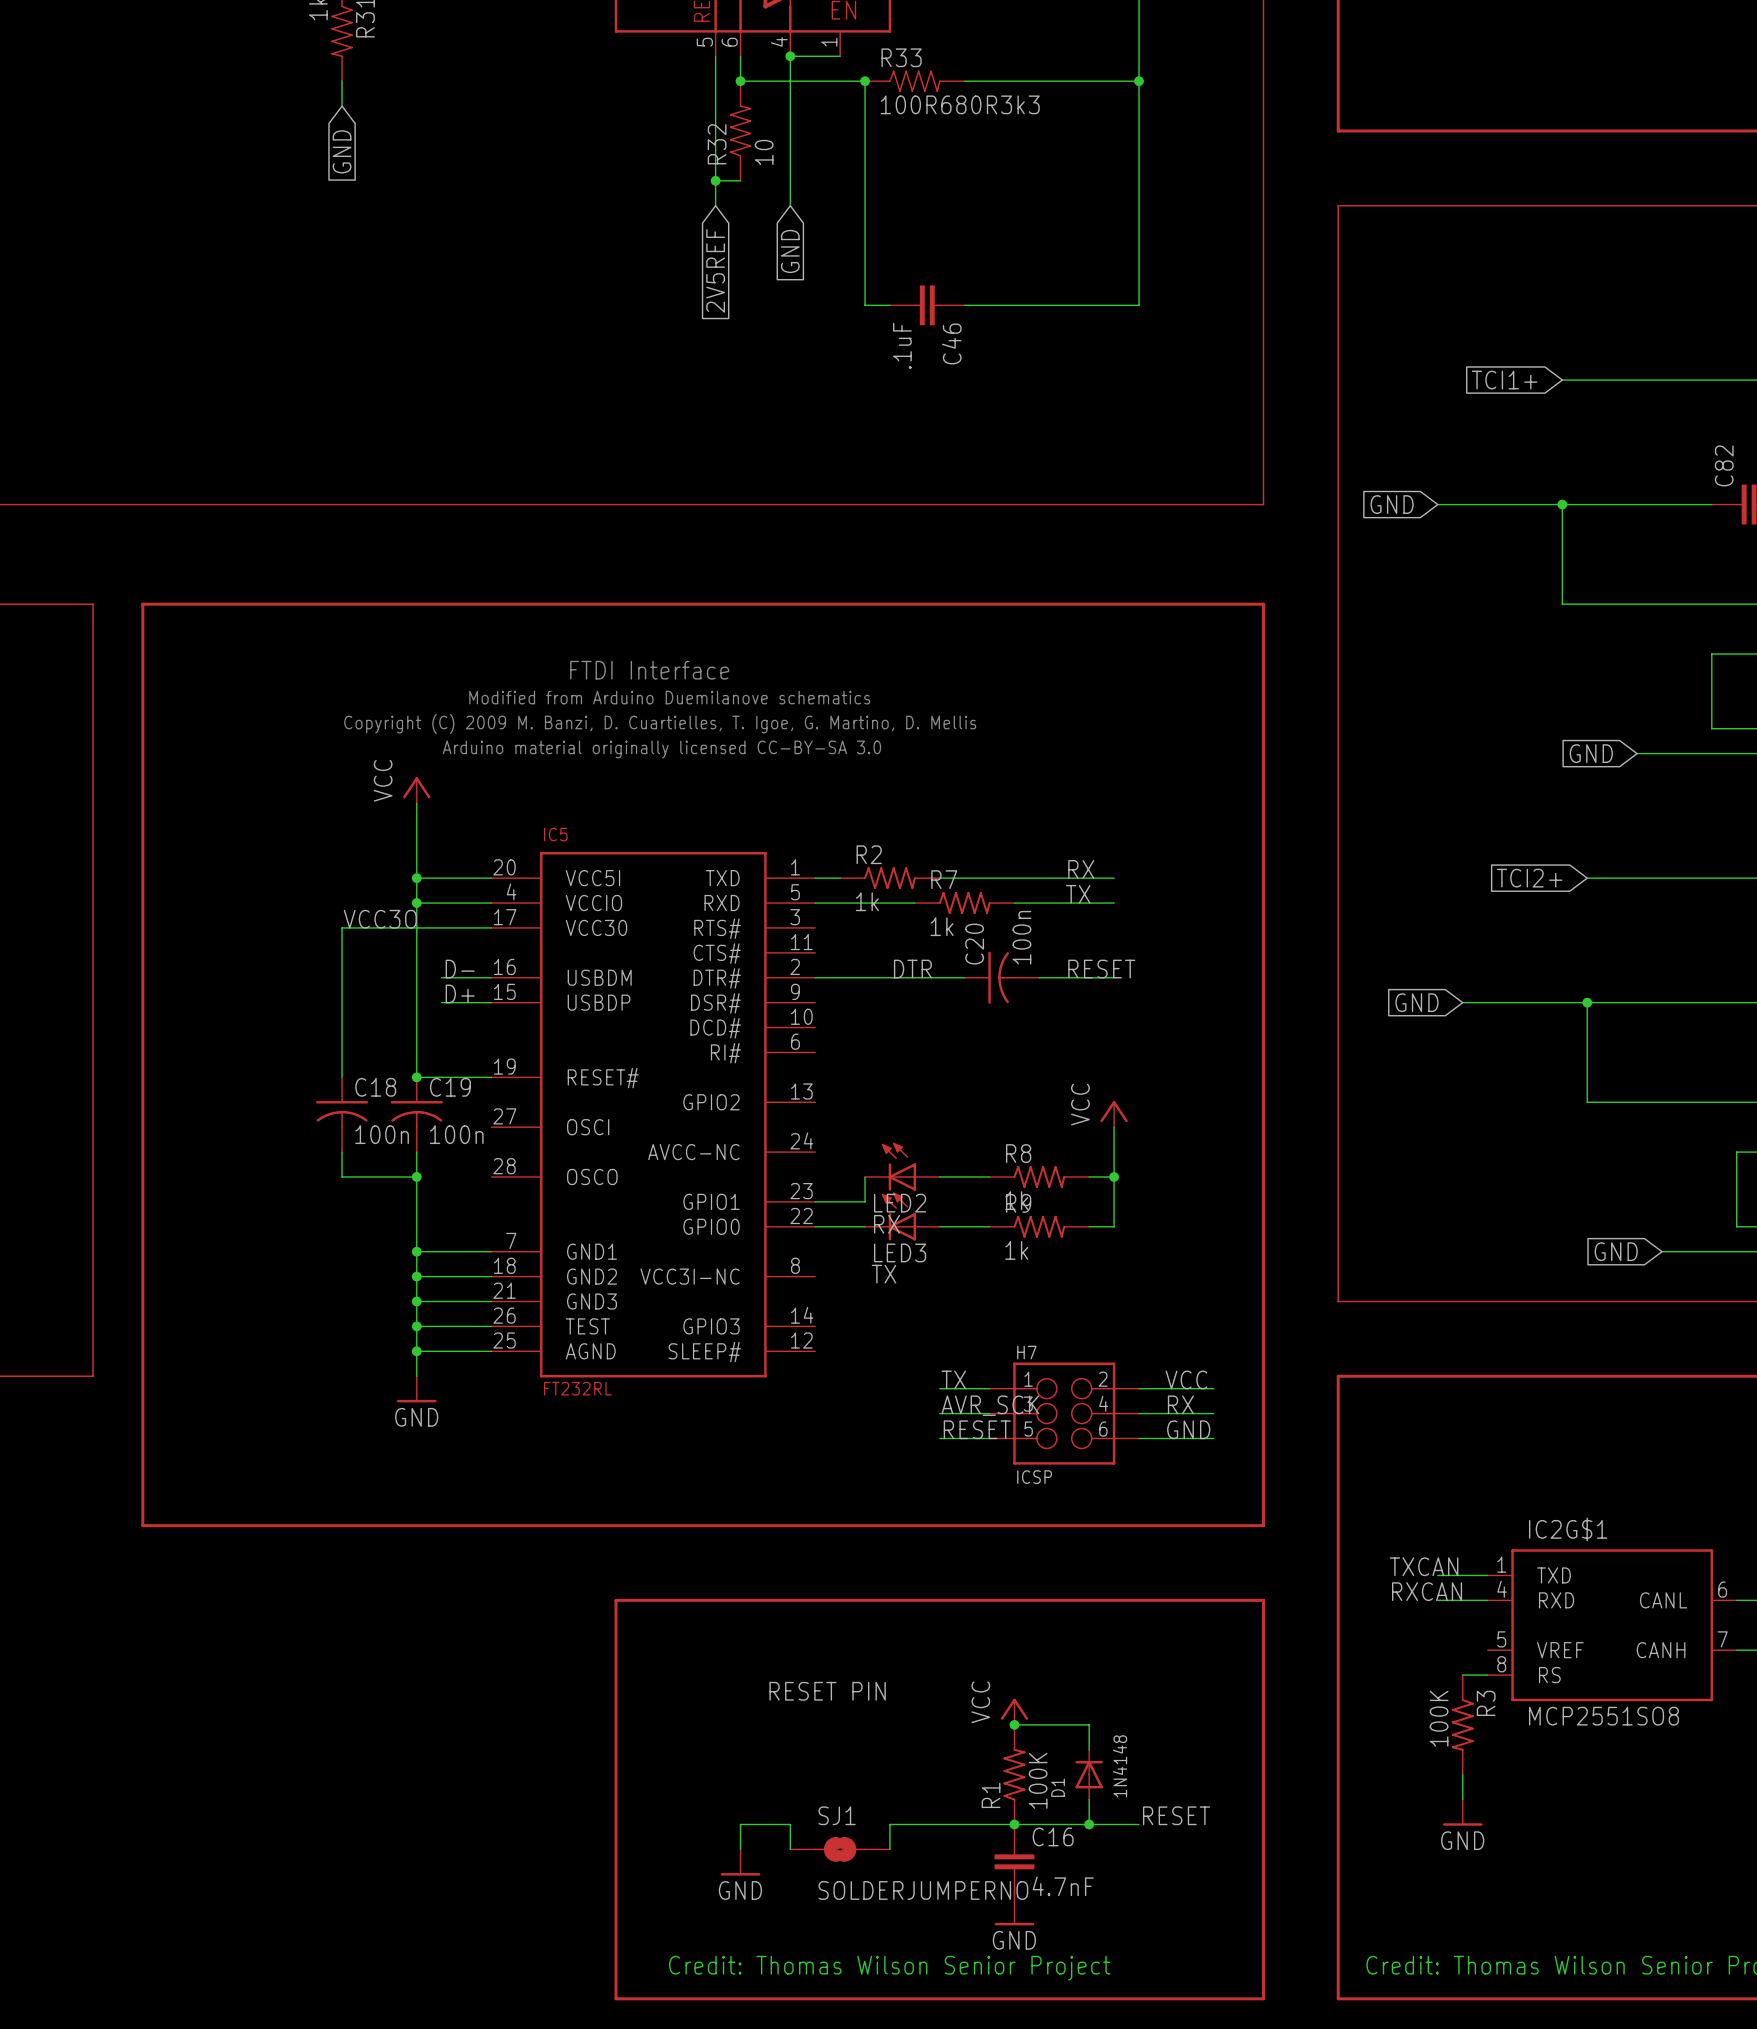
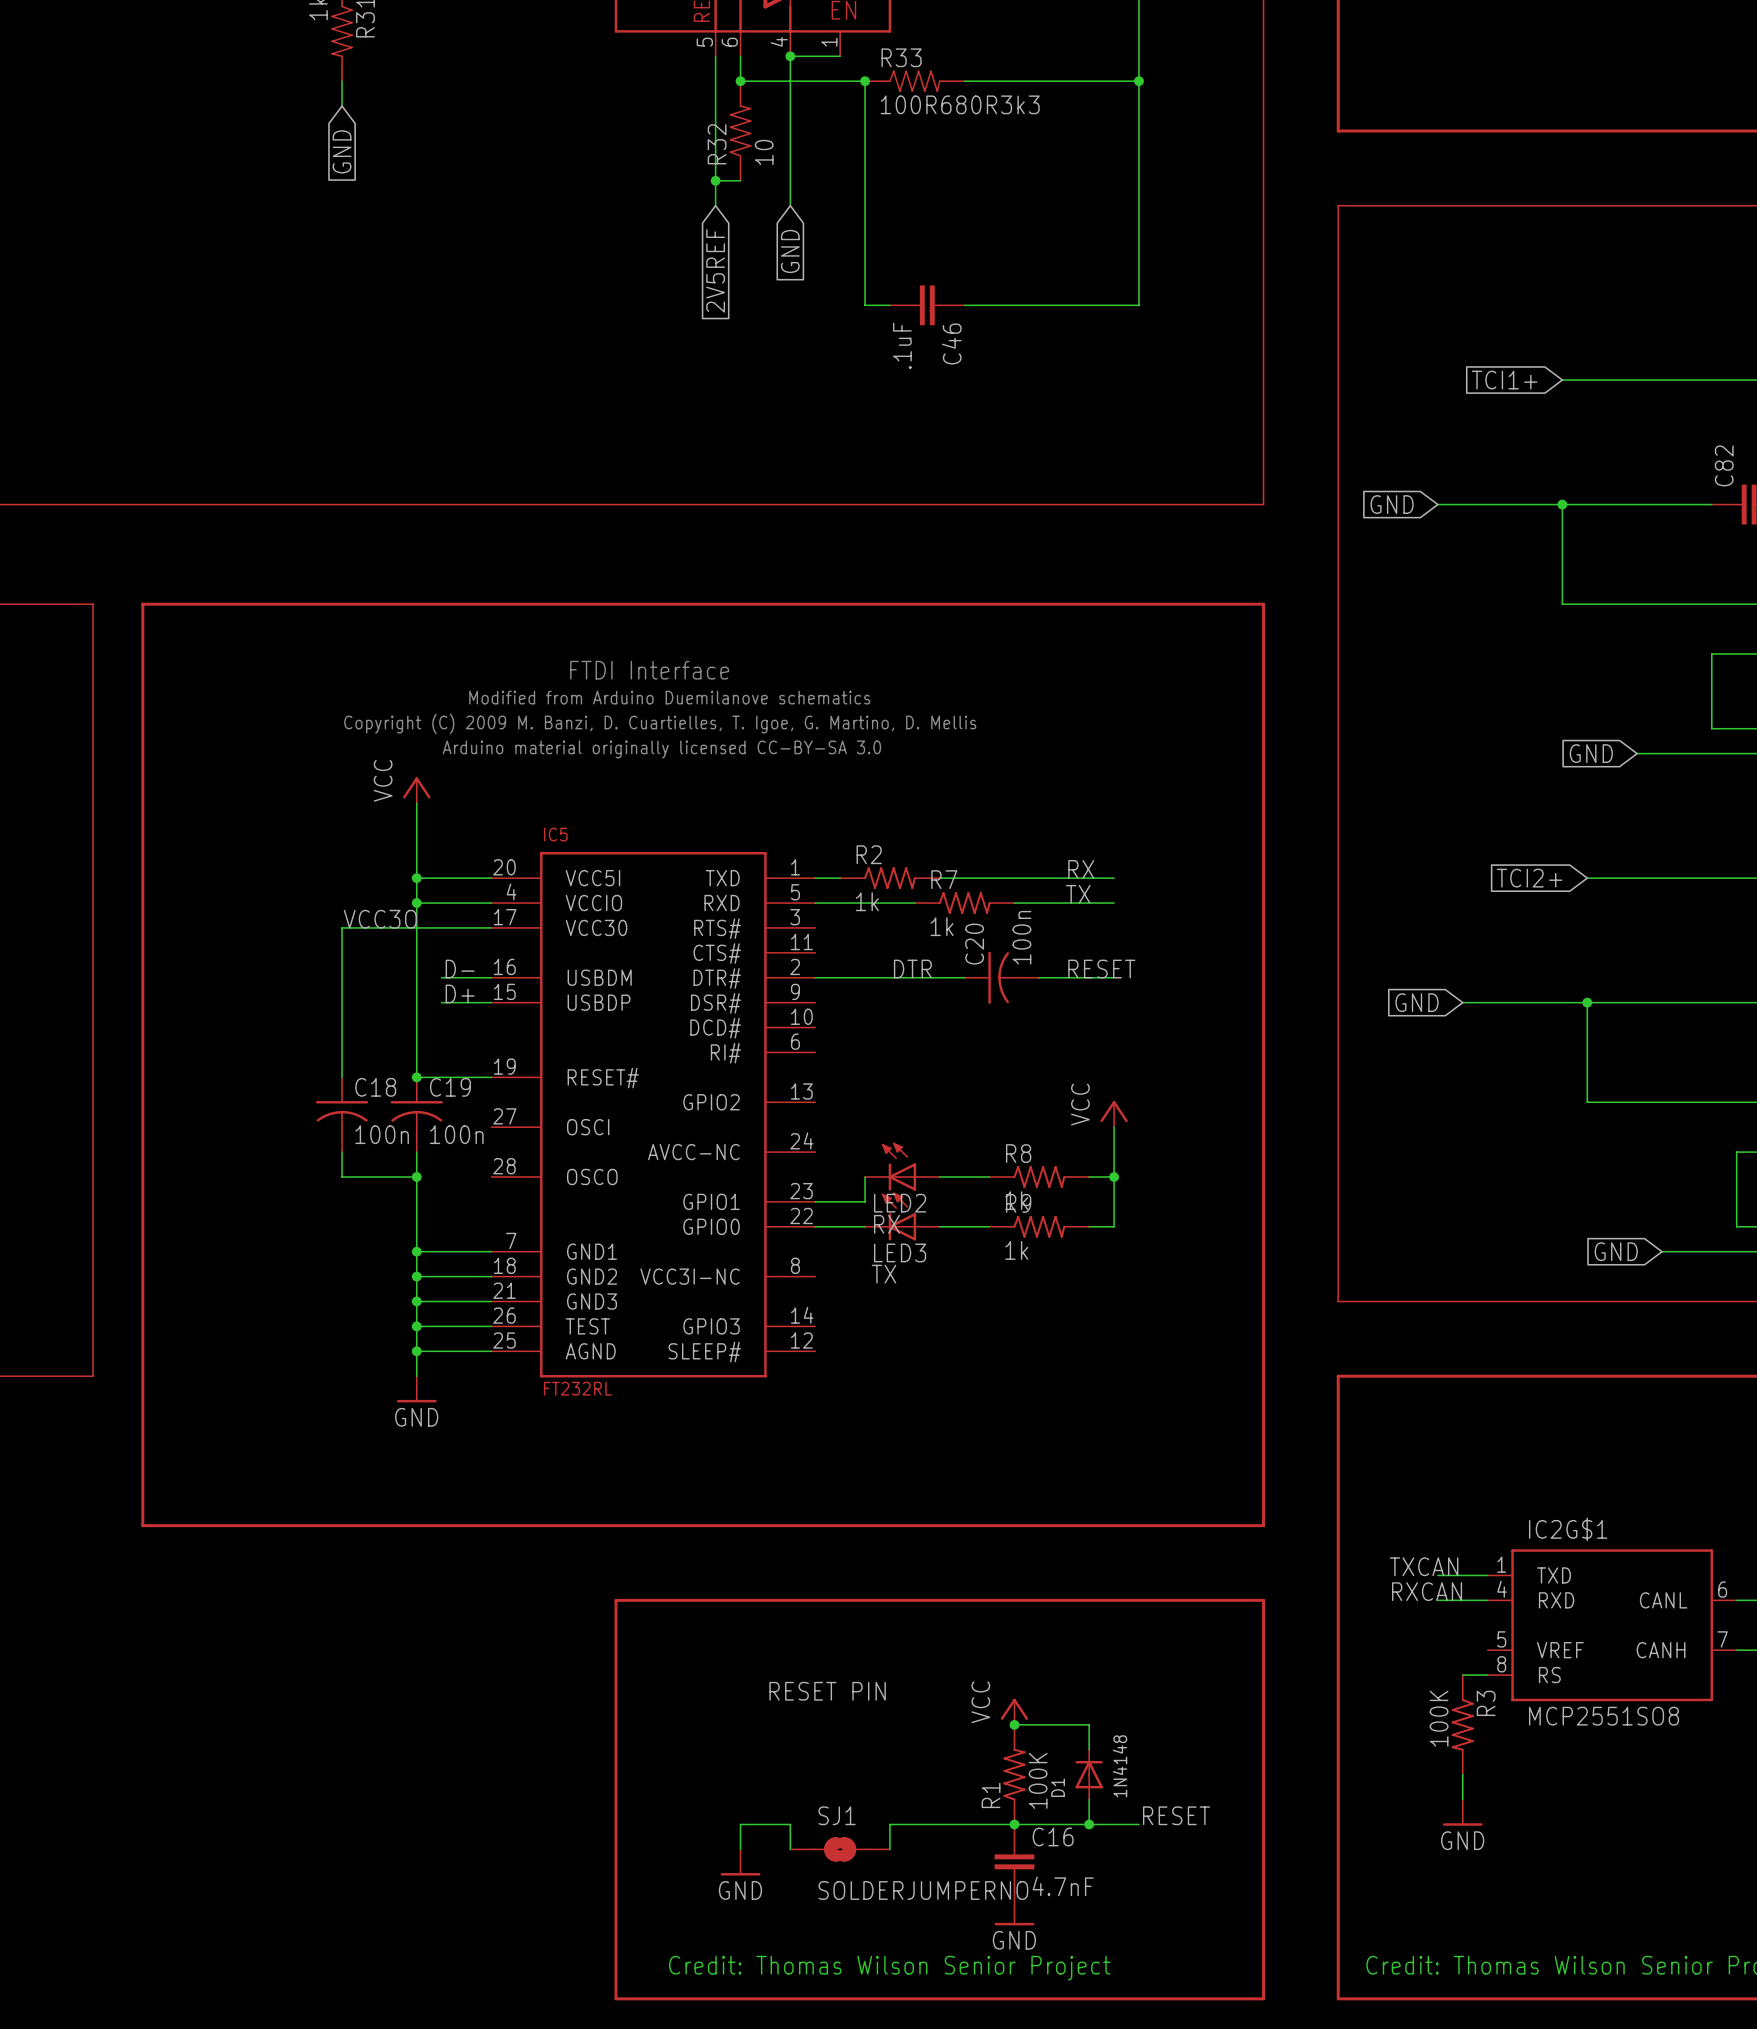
label: TX (953, 1379) -> none
label: VCC (1186, 1379) -> none
wire: (939, 1388) (989, 1388) -> none
wire: (1138, 1388) (1213, 1388) -> none
label: RX (1180, 1404) -> none
label: AVR_SCK (990, 1405) -> none
wire: (939, 1413) (989, 1413) -> none
H7: ICSP (1064, 1413) -> none
wire: (1138, 1413) (1213, 1413) -> none
label: RESET (977, 1429) -> none
label: GND (1188, 1429) -> none
wire: (939, 1438) (989, 1438) -> none
wire: (1138, 1438) (1213, 1438) -> none

